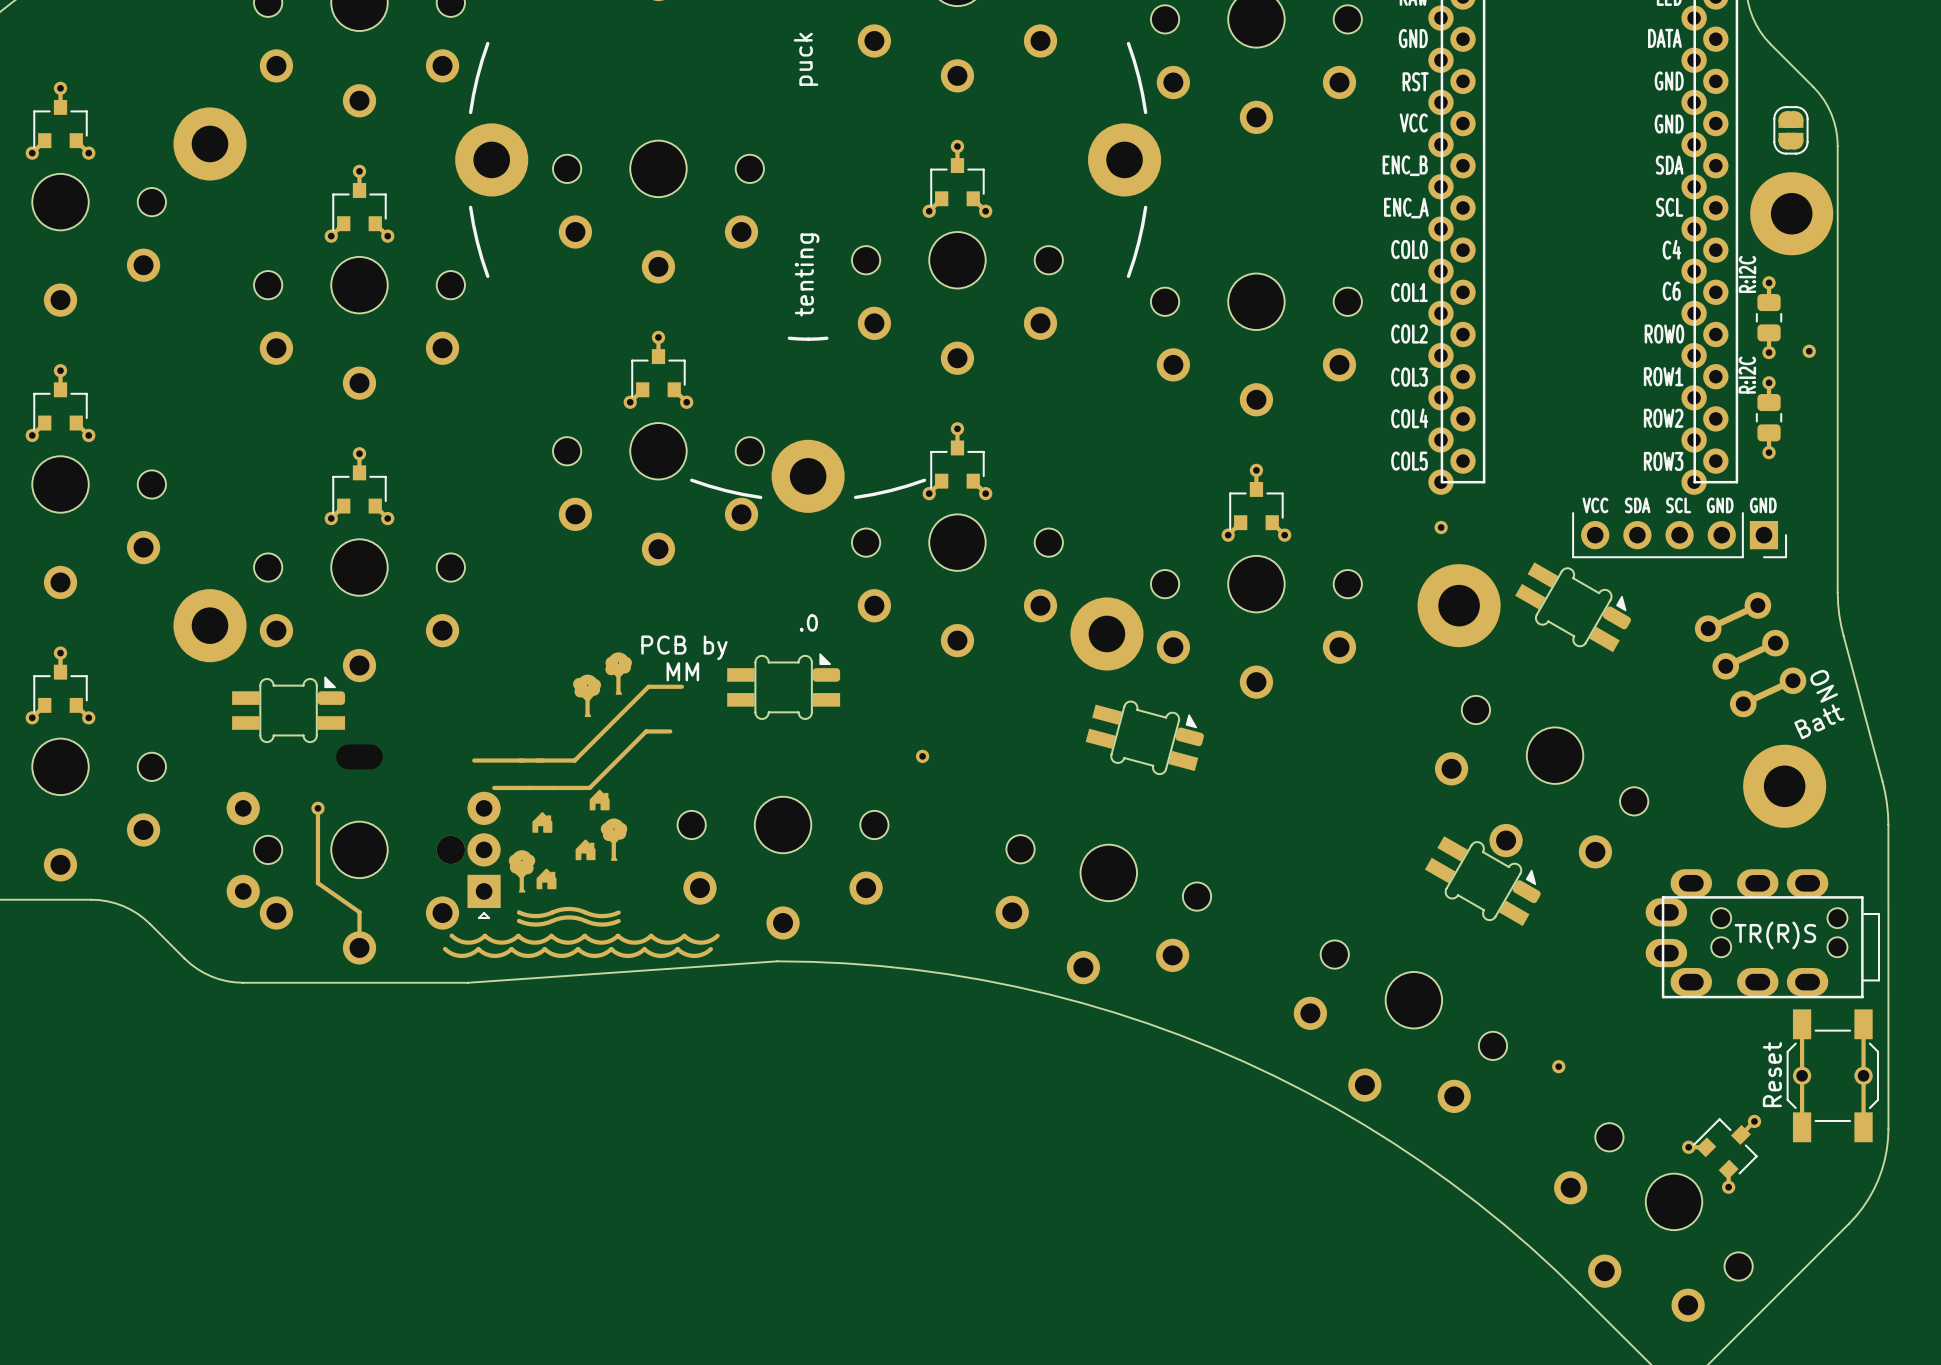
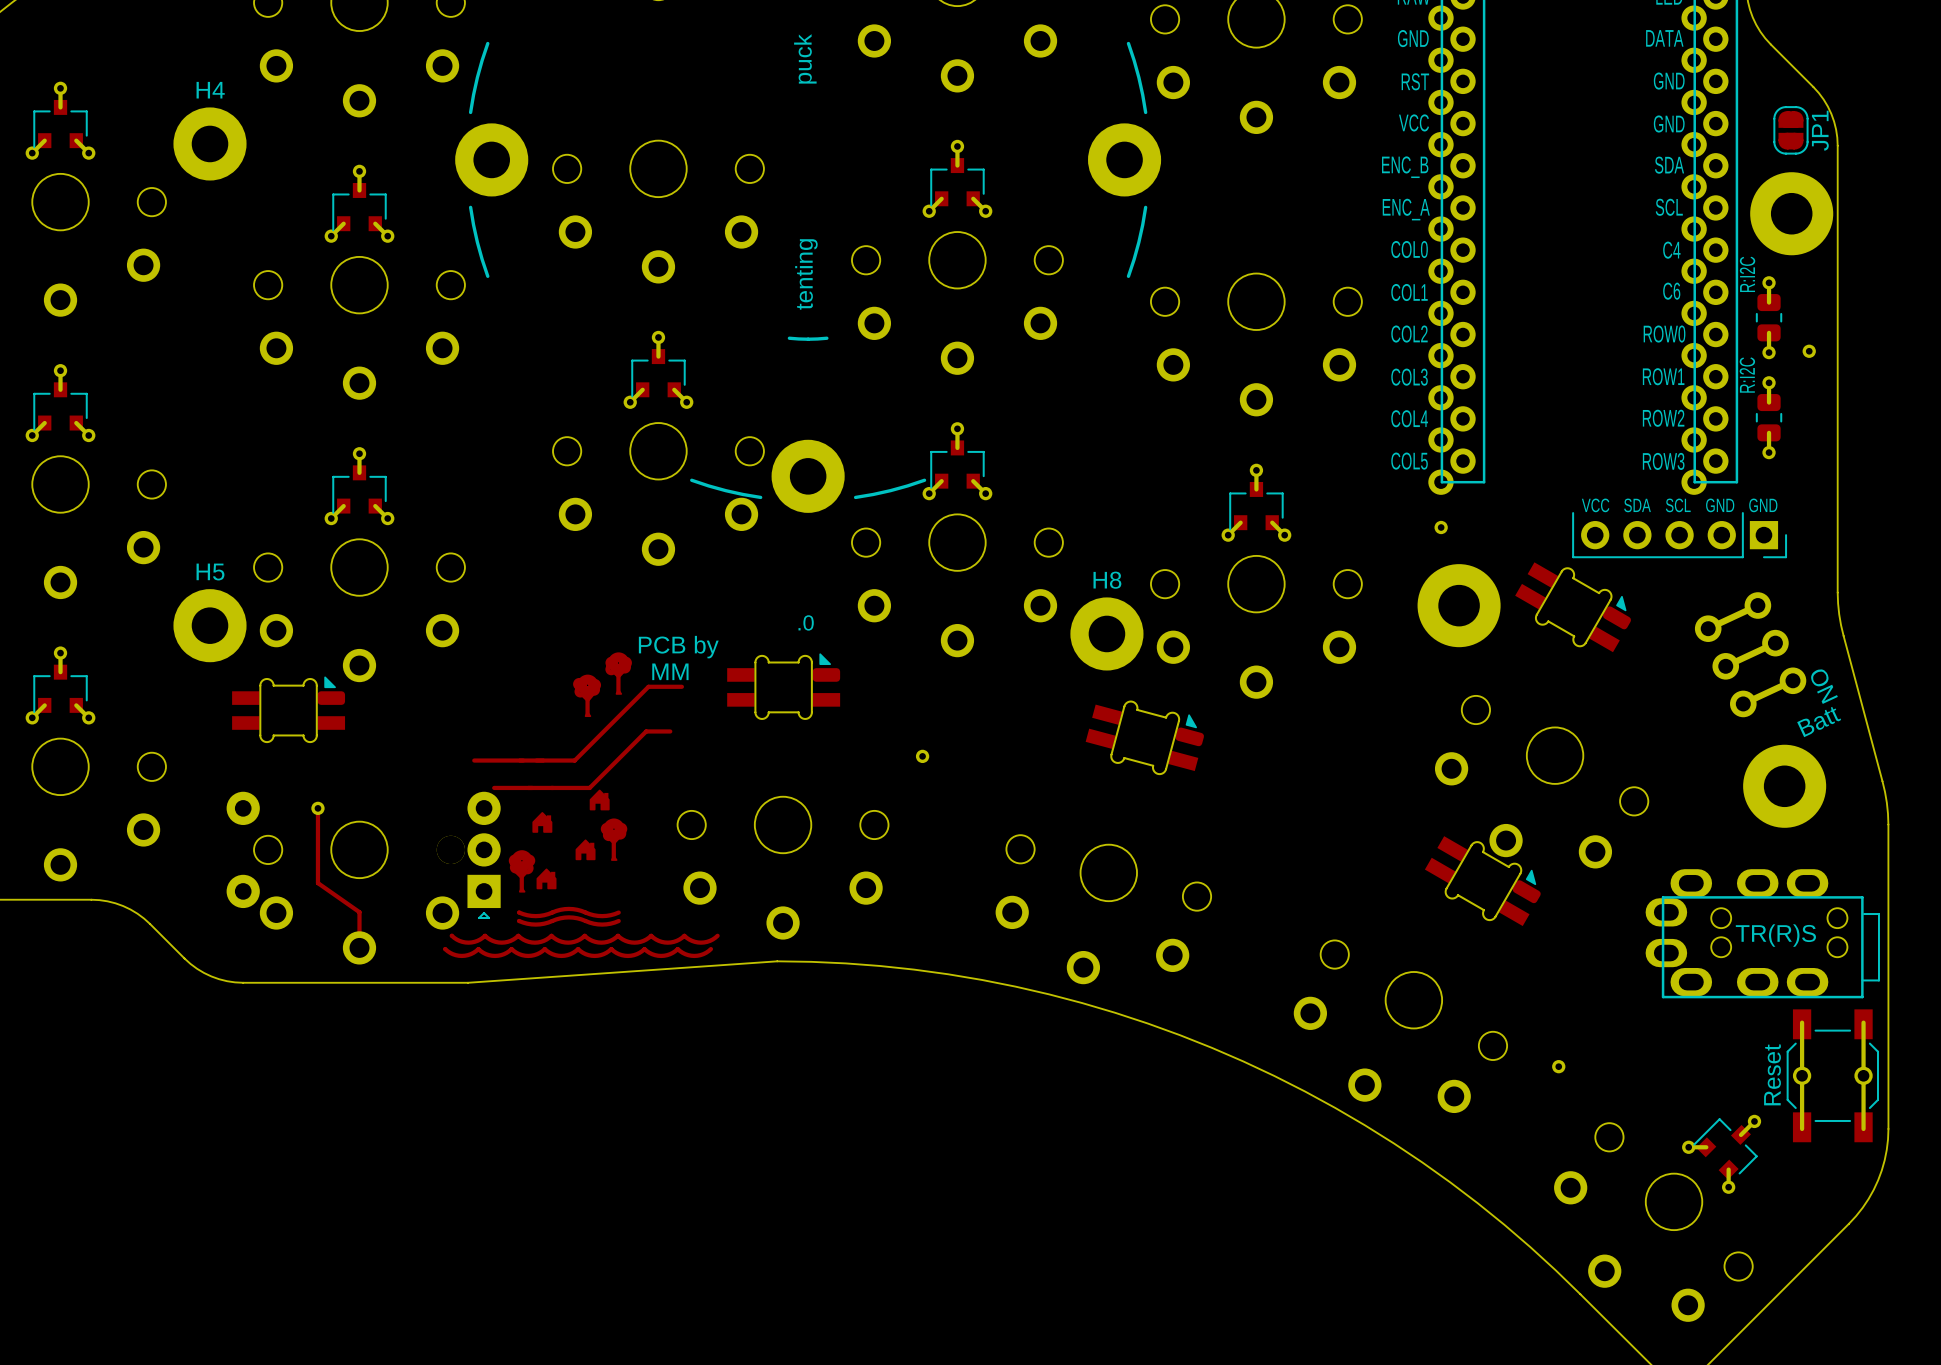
H4 name: none -> H4 (210, 90)
JP1 name: none -> JP1 (1820, 130)
H5 name: none -> H5 (210, 572)
H8 name: none -> H8 (1107, 580)

